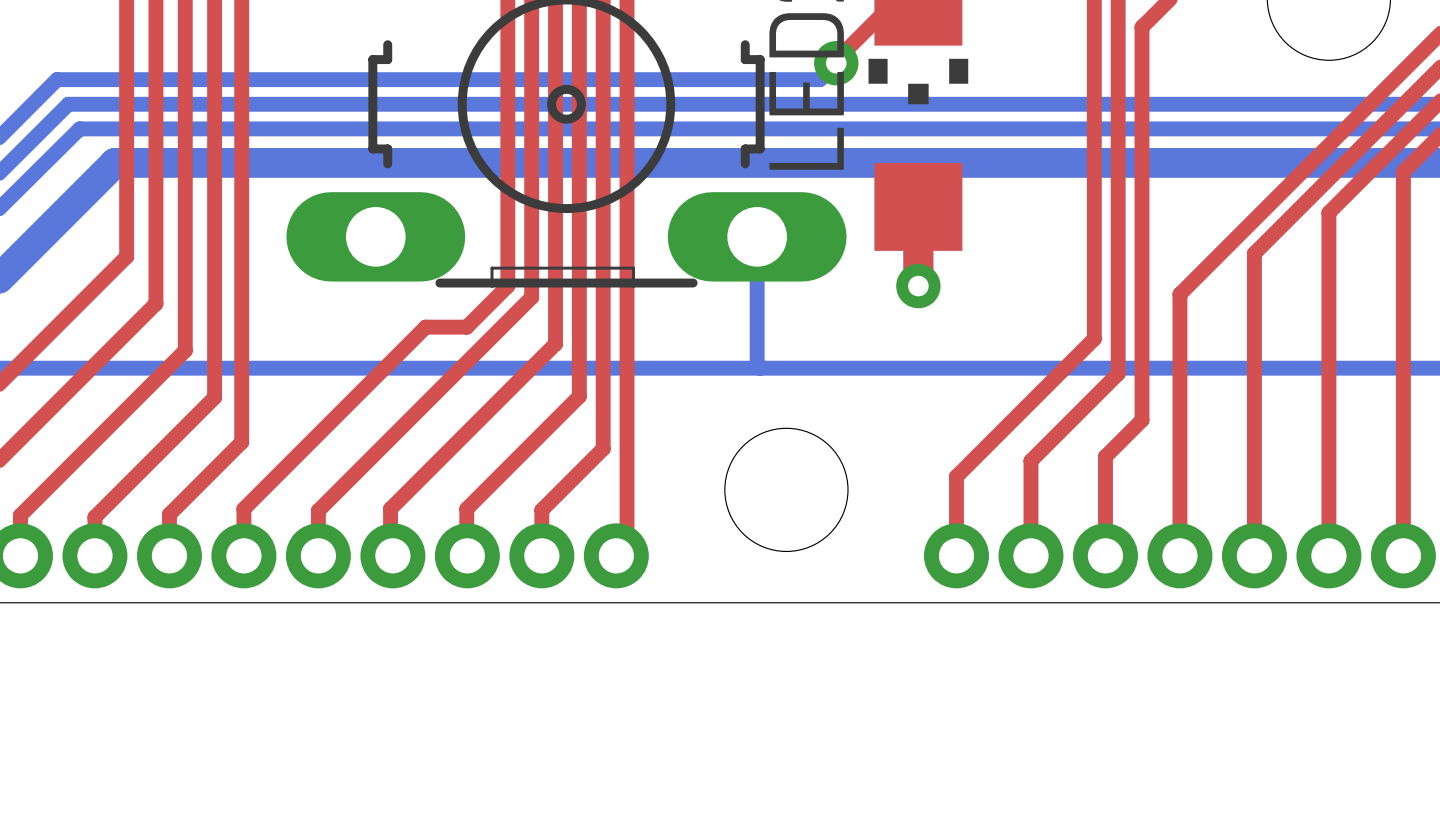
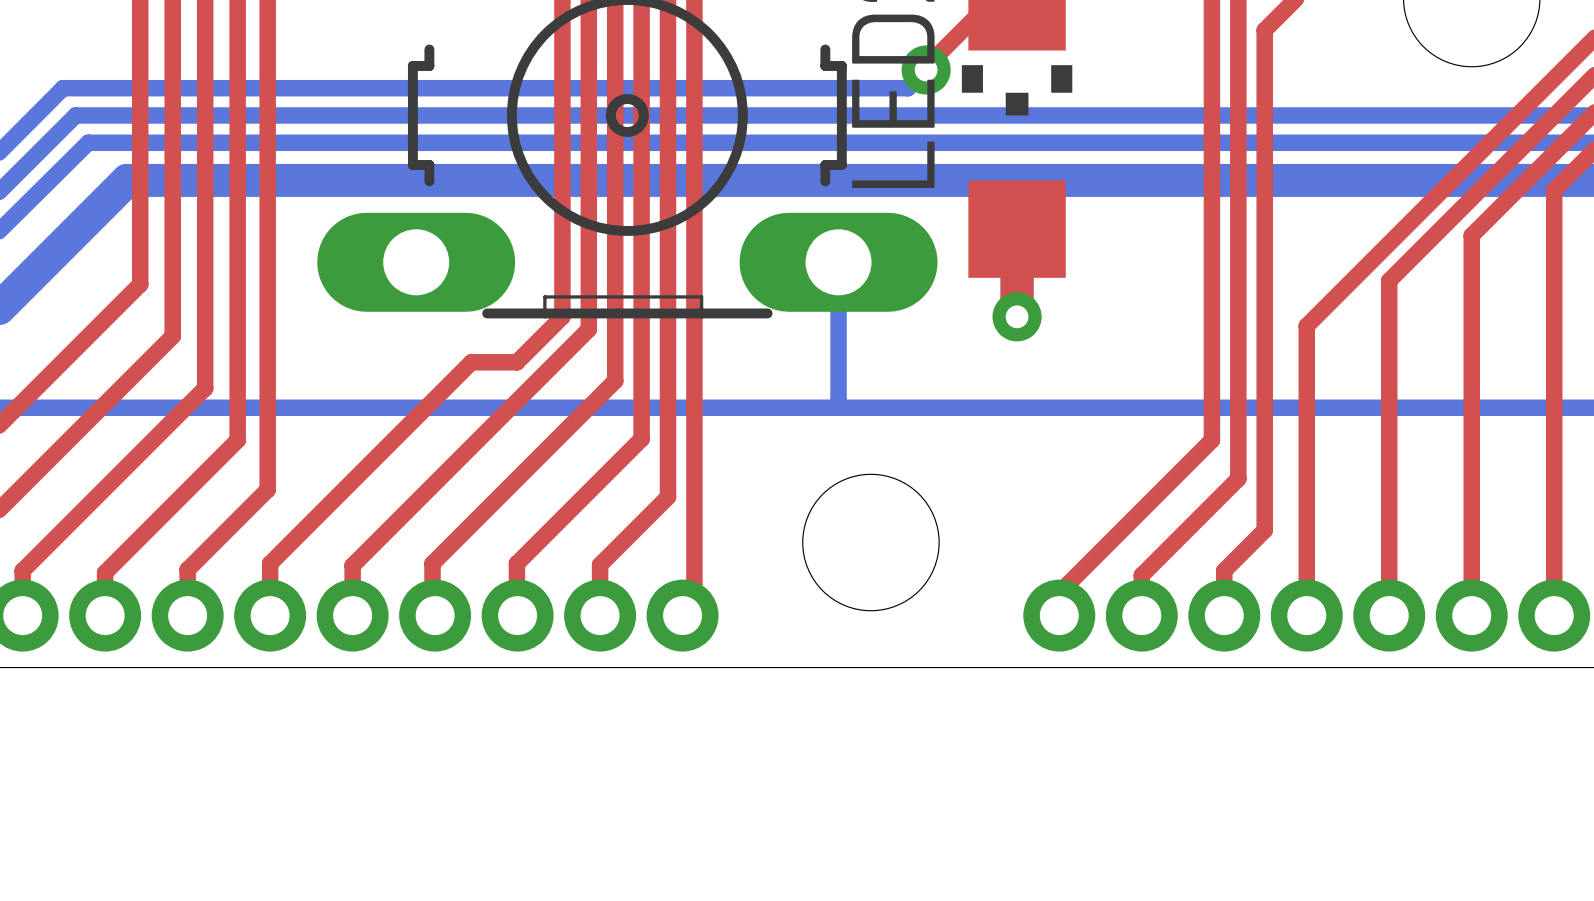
top track: (1094, 338) (956, 476) (956, 535) -> none
top track: (1118, 373) (1094, 397) -> (1211, 375) (1211, 440)
top track: none -> (1238, 413) (1238, 478) (1141, 575)
top track: (1141, 420) (1105, 456) (1105, 515) -> (1264, 465) (1264, 530) (1224, 570)
top track: (1030, 460) (1030, 519) -> (1141, 510) (1059, 592)

